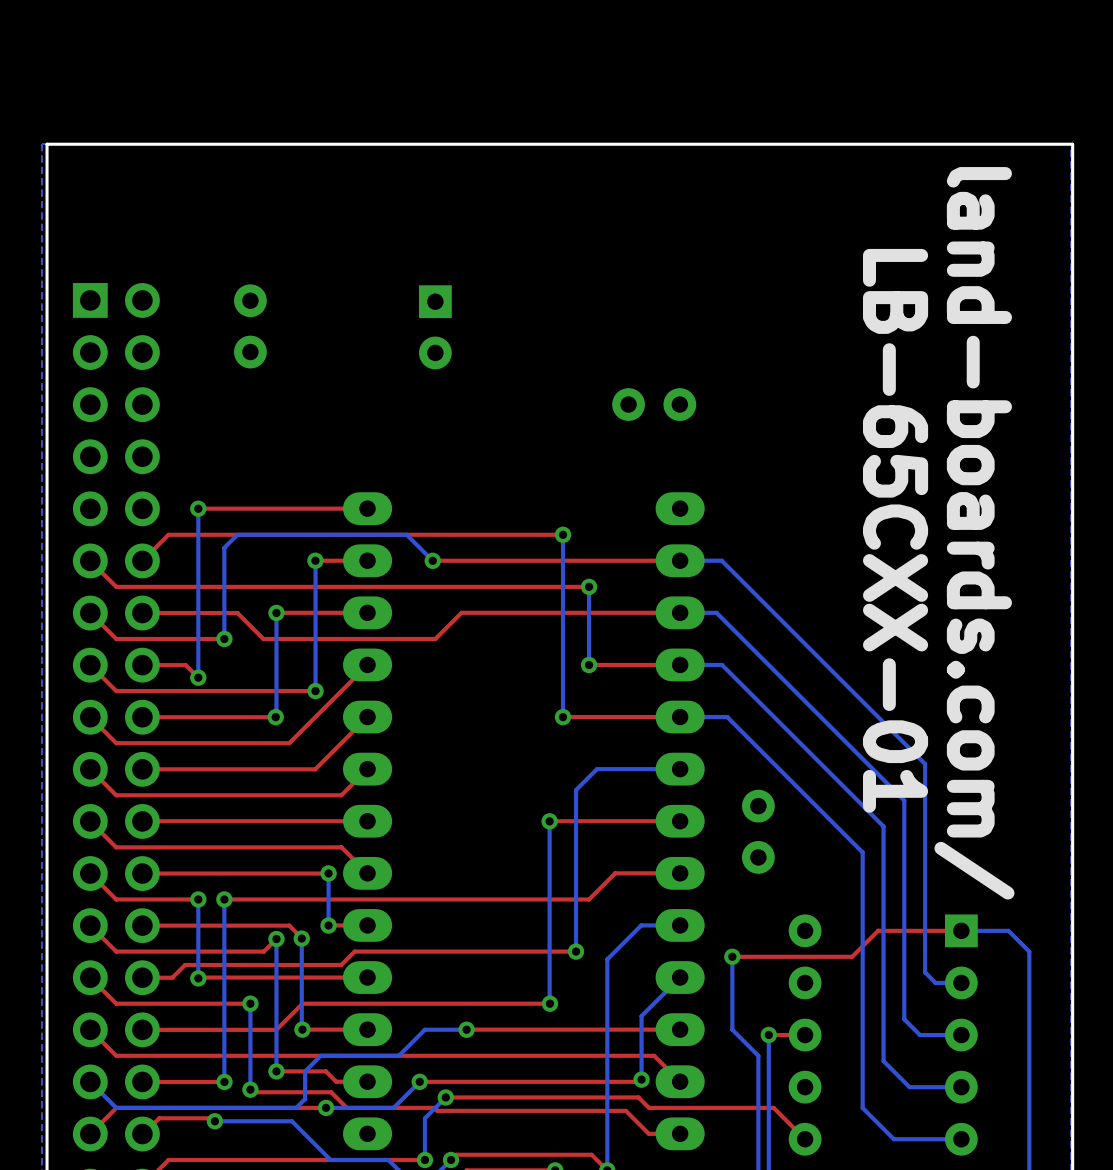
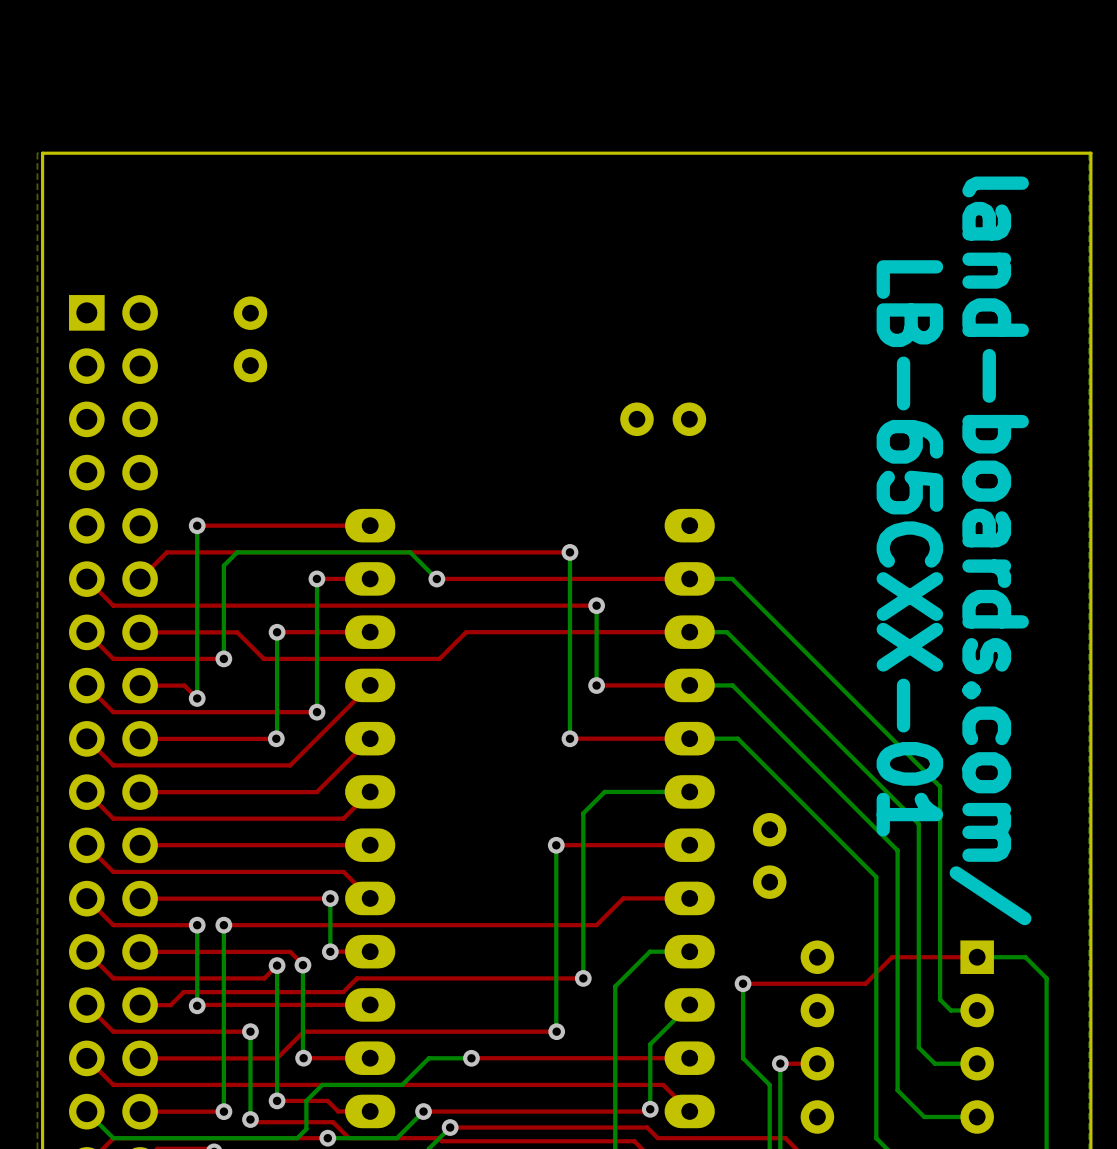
part: (435, 327) -> none

